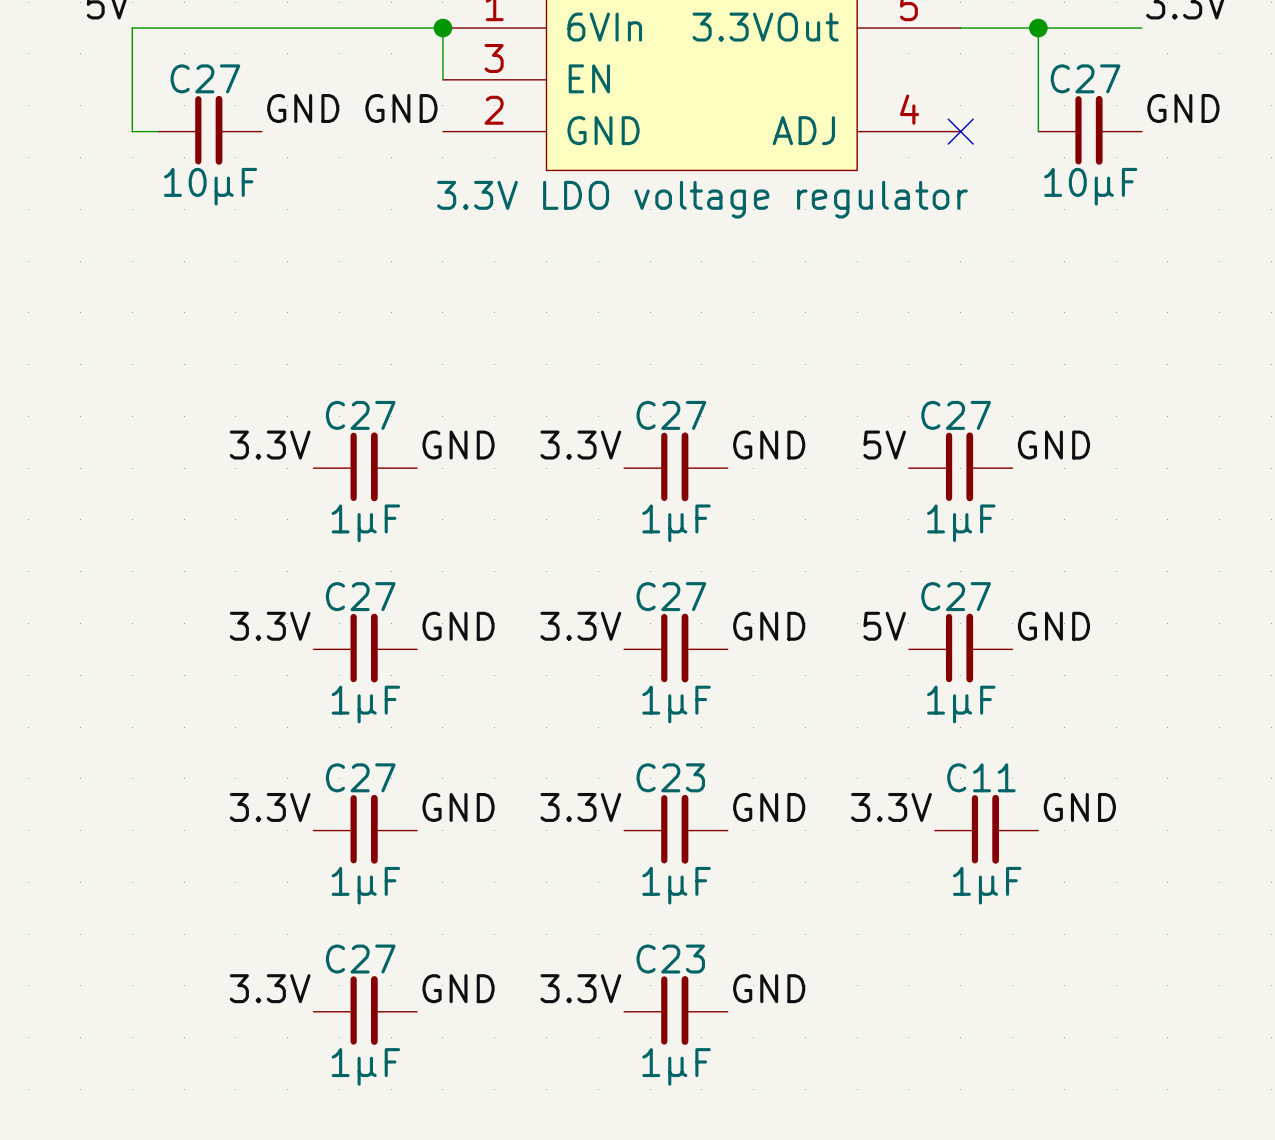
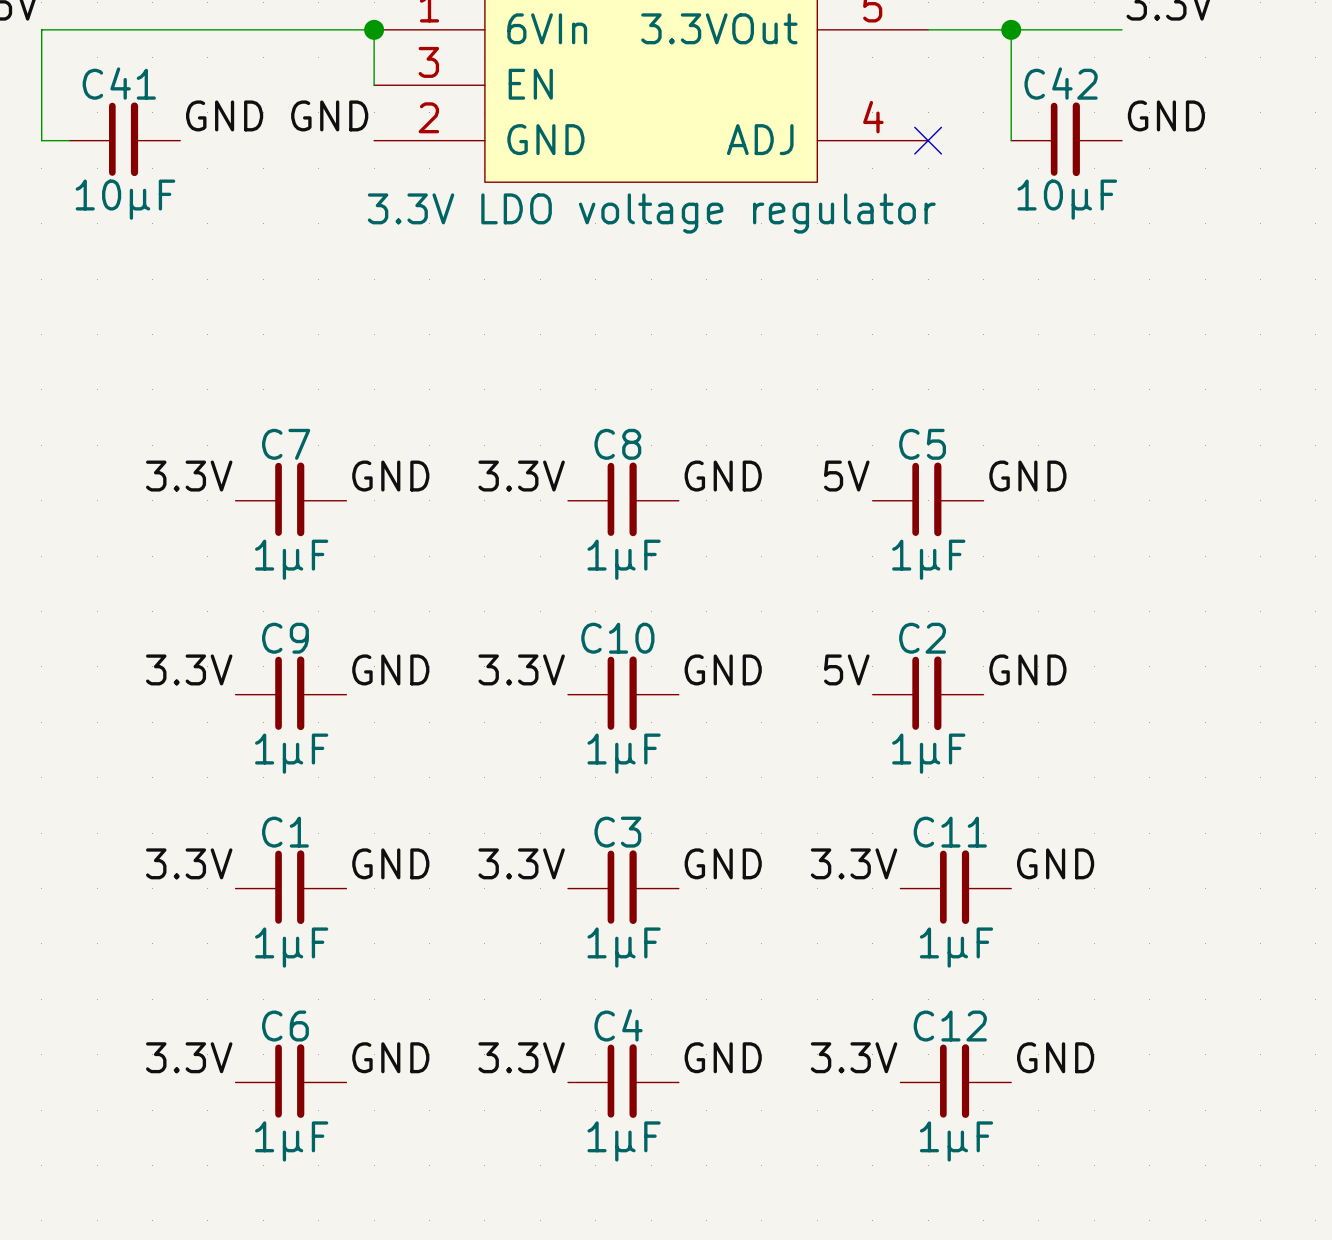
C27 name: C27 (205, 78) -> C41 (119, 83)
C27 name: C27 (1085, 78) -> C42 (1061, 83)
C27 name: C27 (360, 415) -> C7 (286, 444)
C27 name: C27 (671, 415) -> C8 (617, 444)
C27 name: C27 (956, 415) -> C5 (922, 444)
C27 name: C27 (360, 596) -> C9 (285, 638)
C27 name: C27 (671, 596) -> C10 (617, 638)
C27 name: C27 (956, 596) -> C2 (922, 638)
C27 name: C27 (360, 777) -> C1 (285, 832)
C23 name: C23 (670, 777) -> C3 (617, 832)
C27 name: C27 (360, 959) -> C6 (285, 1026)
C23 name: C23 (670, 959) -> C4 (618, 1025)
label: none -> 3.3V (854, 1057)
label: none -> GND (1055, 1057)
C12: none -> 1μF (955, 1081)

